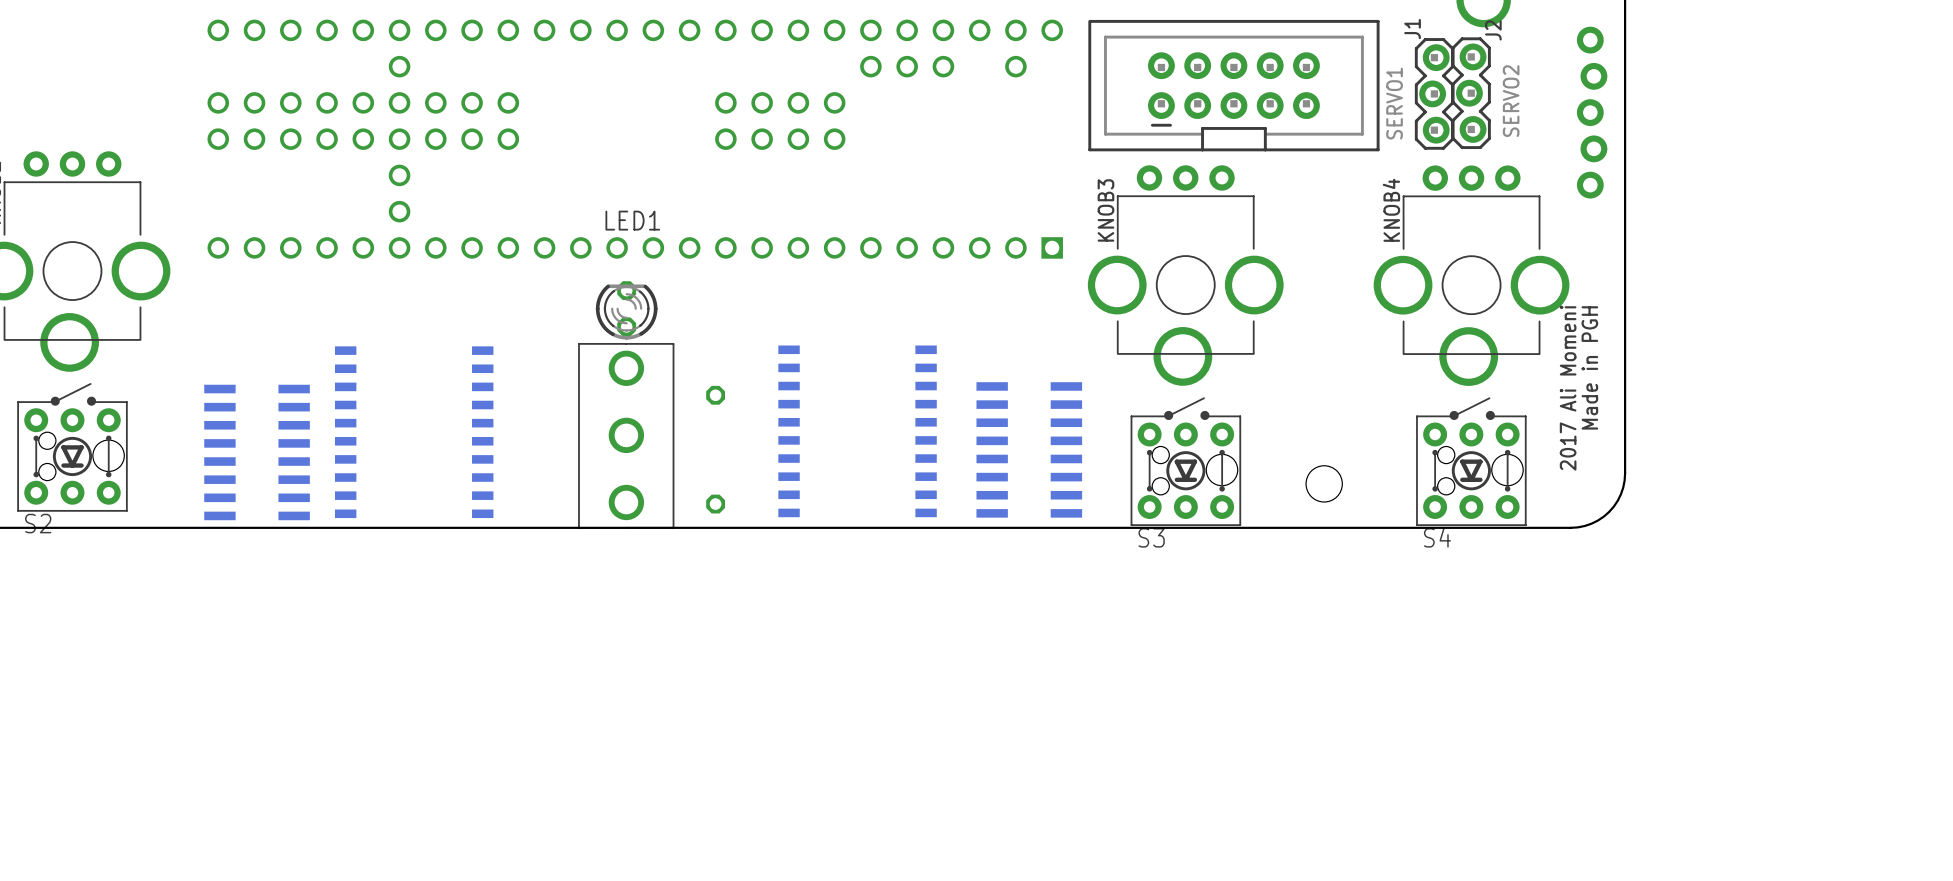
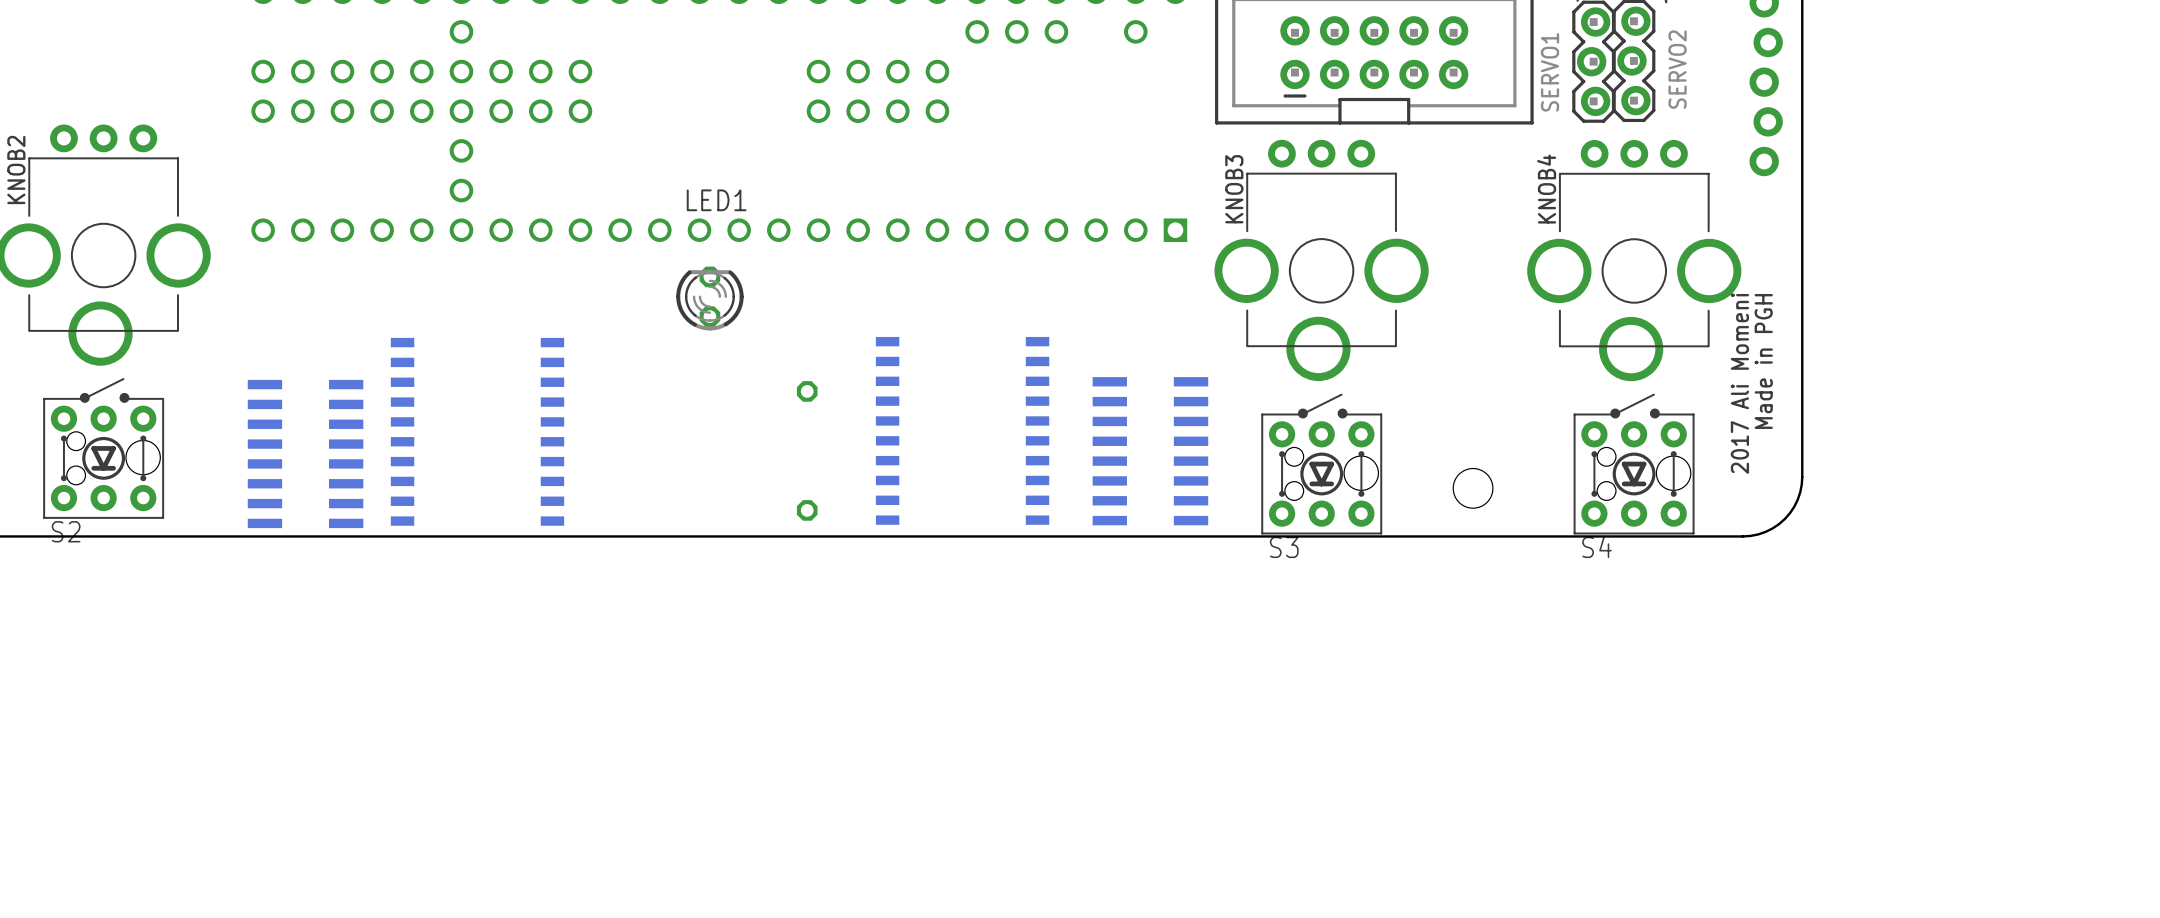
part: (626, 435) -> none

